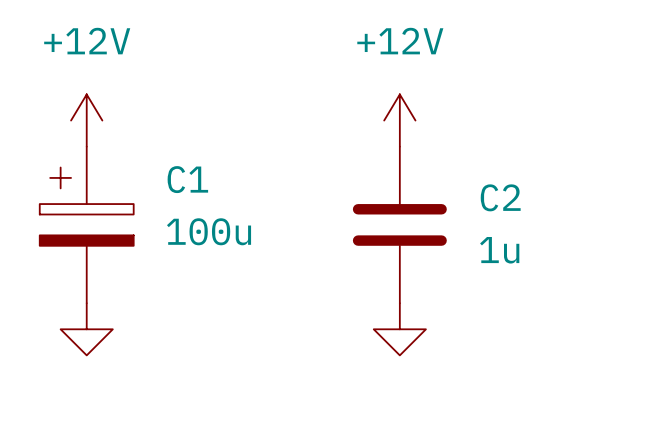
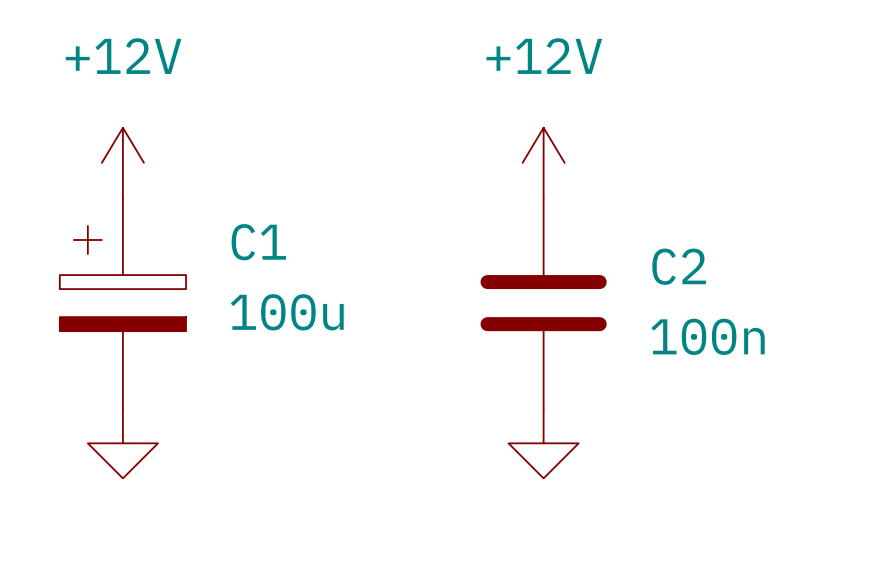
C2 value: 1u (499, 250) -> 100n (708, 336)

